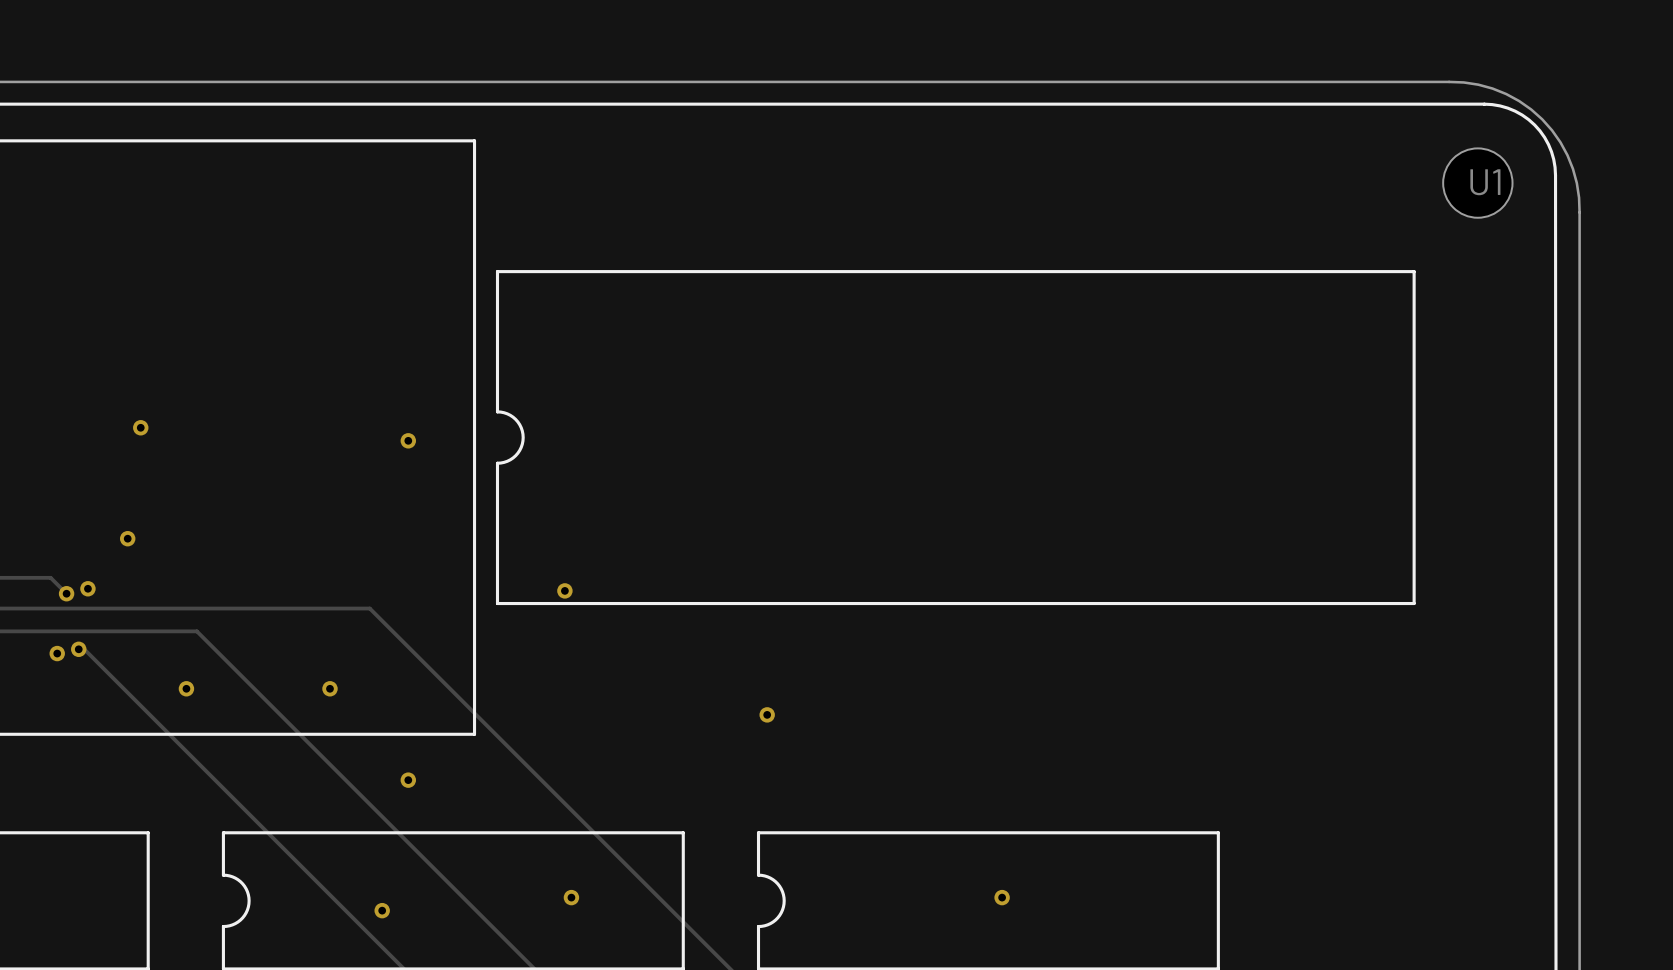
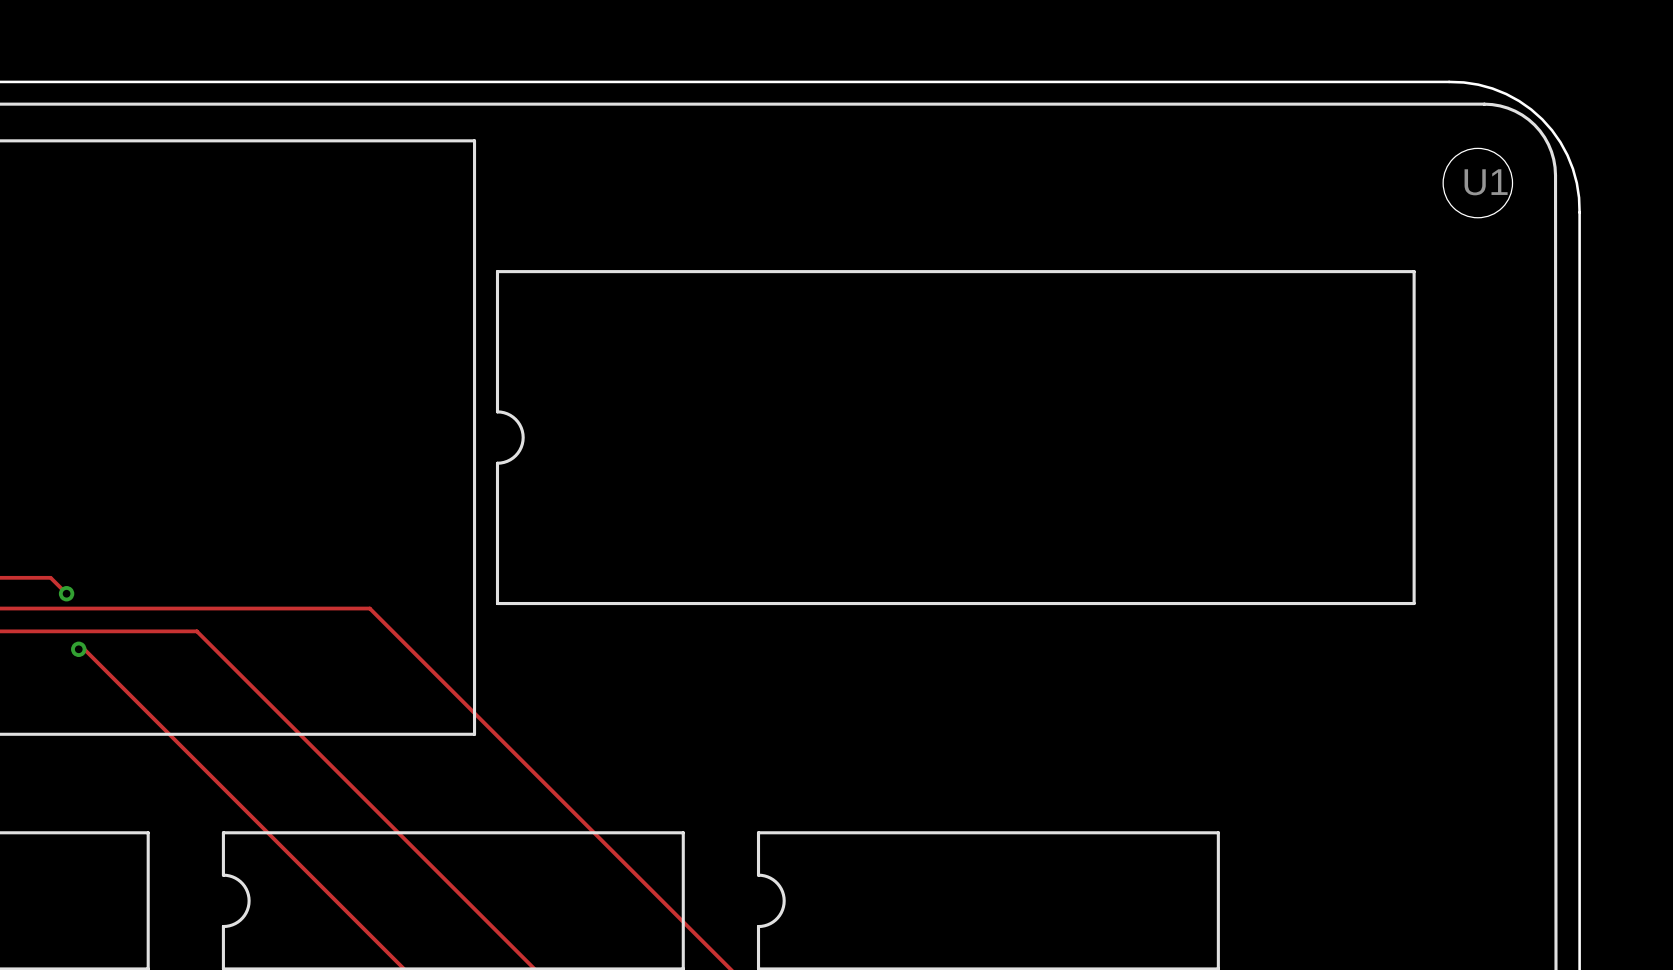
via: (140, 427) -> none
via: (408, 440) -> none
via: (127, 538) -> none
via: (87, 588) -> none
via: (564, 590) -> none
via: (57, 653) -> none
via: (186, 688) -> none
via: (329, 688) -> none
via: (767, 714) -> none
via: (408, 780) -> none
via: (571, 897) -> none
via: (1002, 897) -> none
via: (382, 910) -> none

